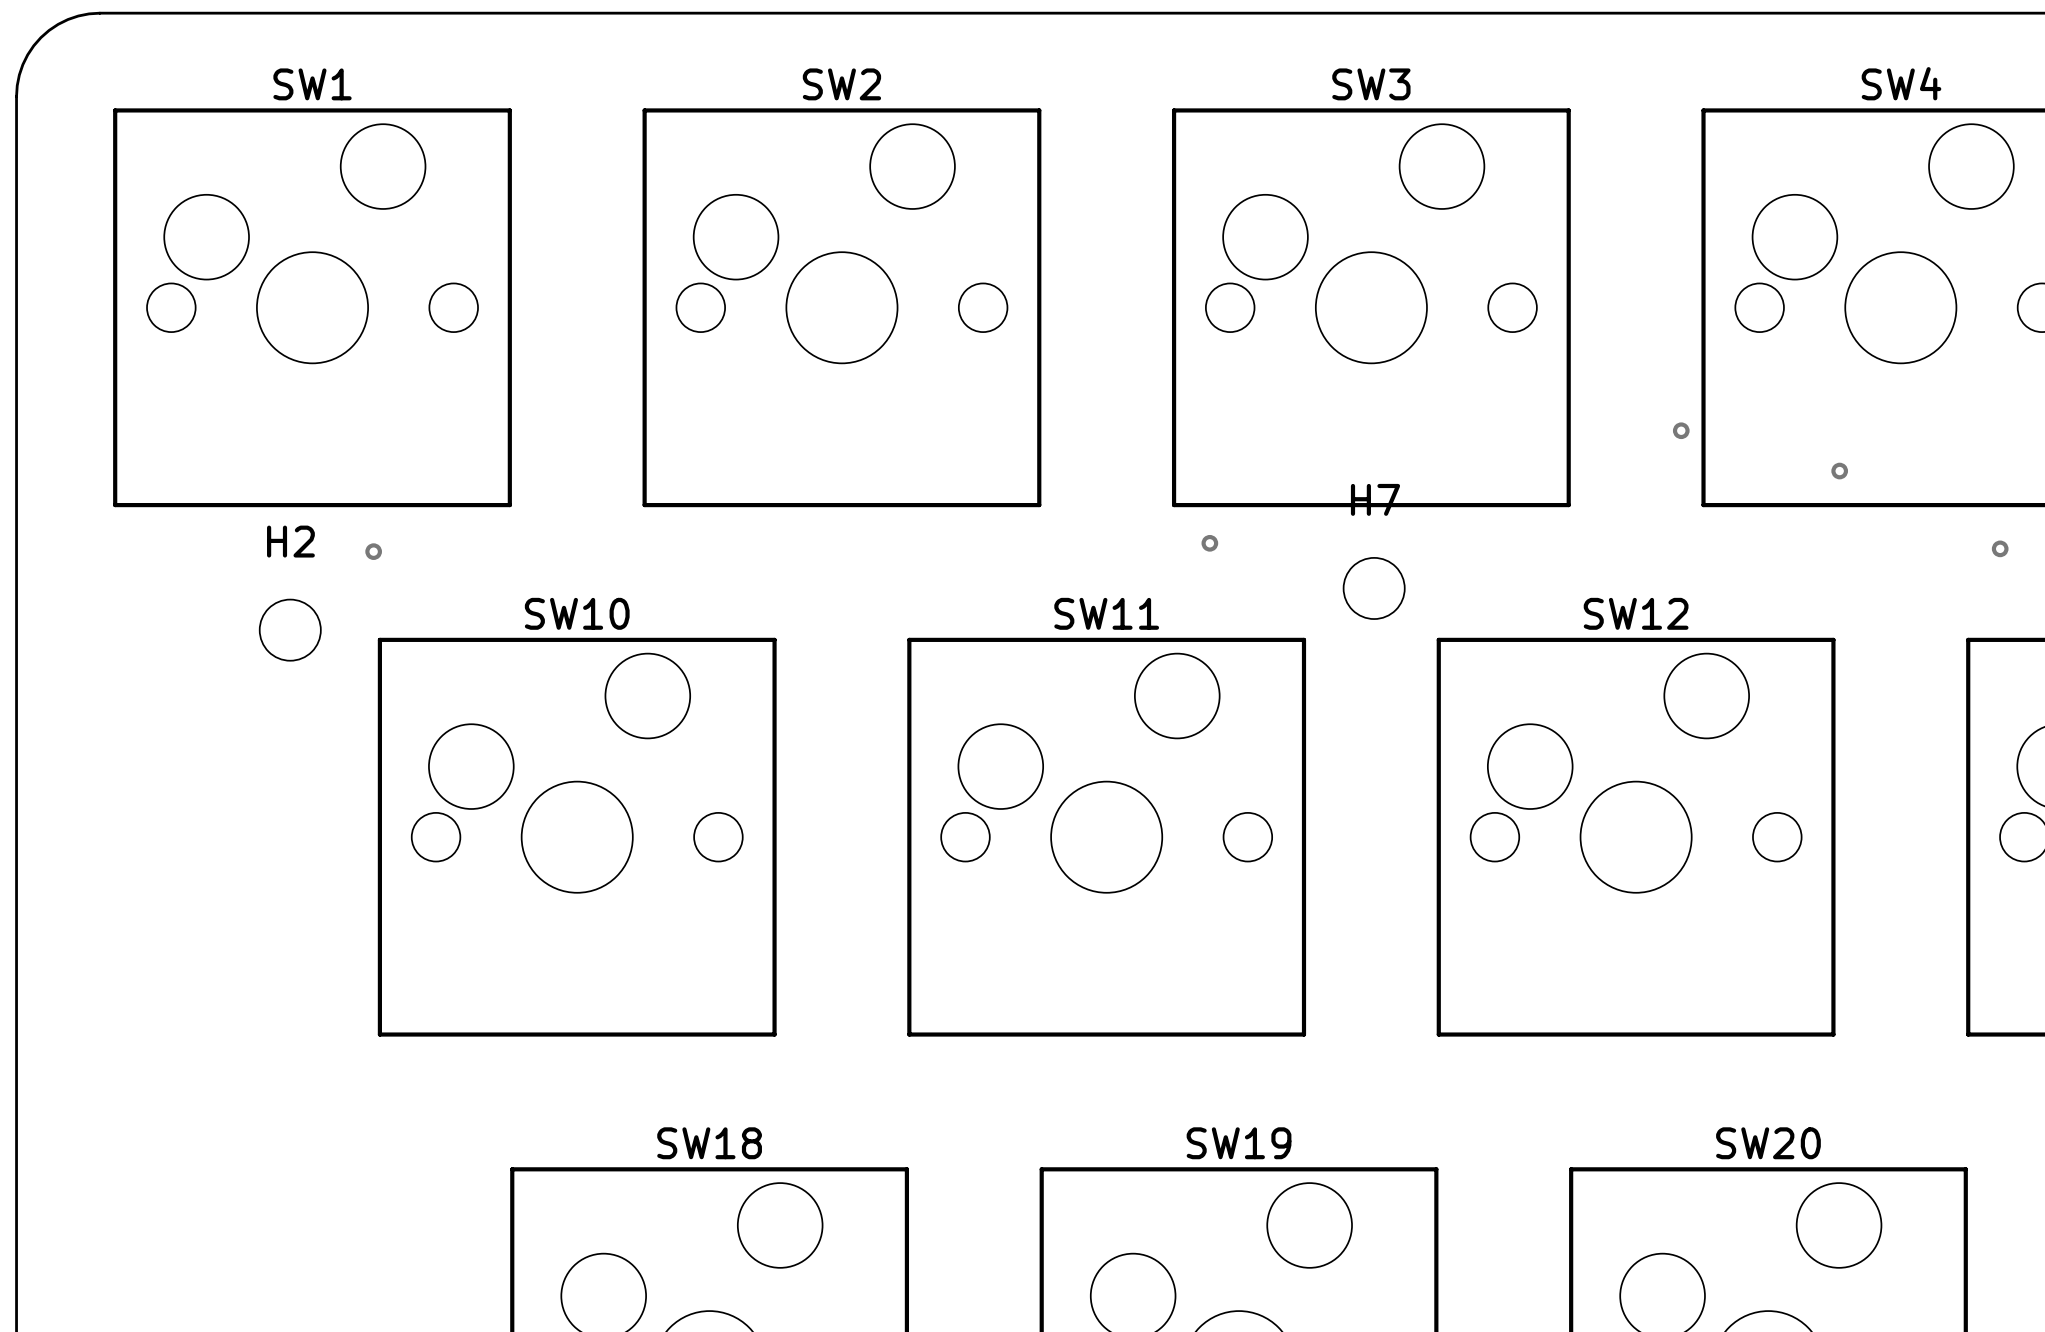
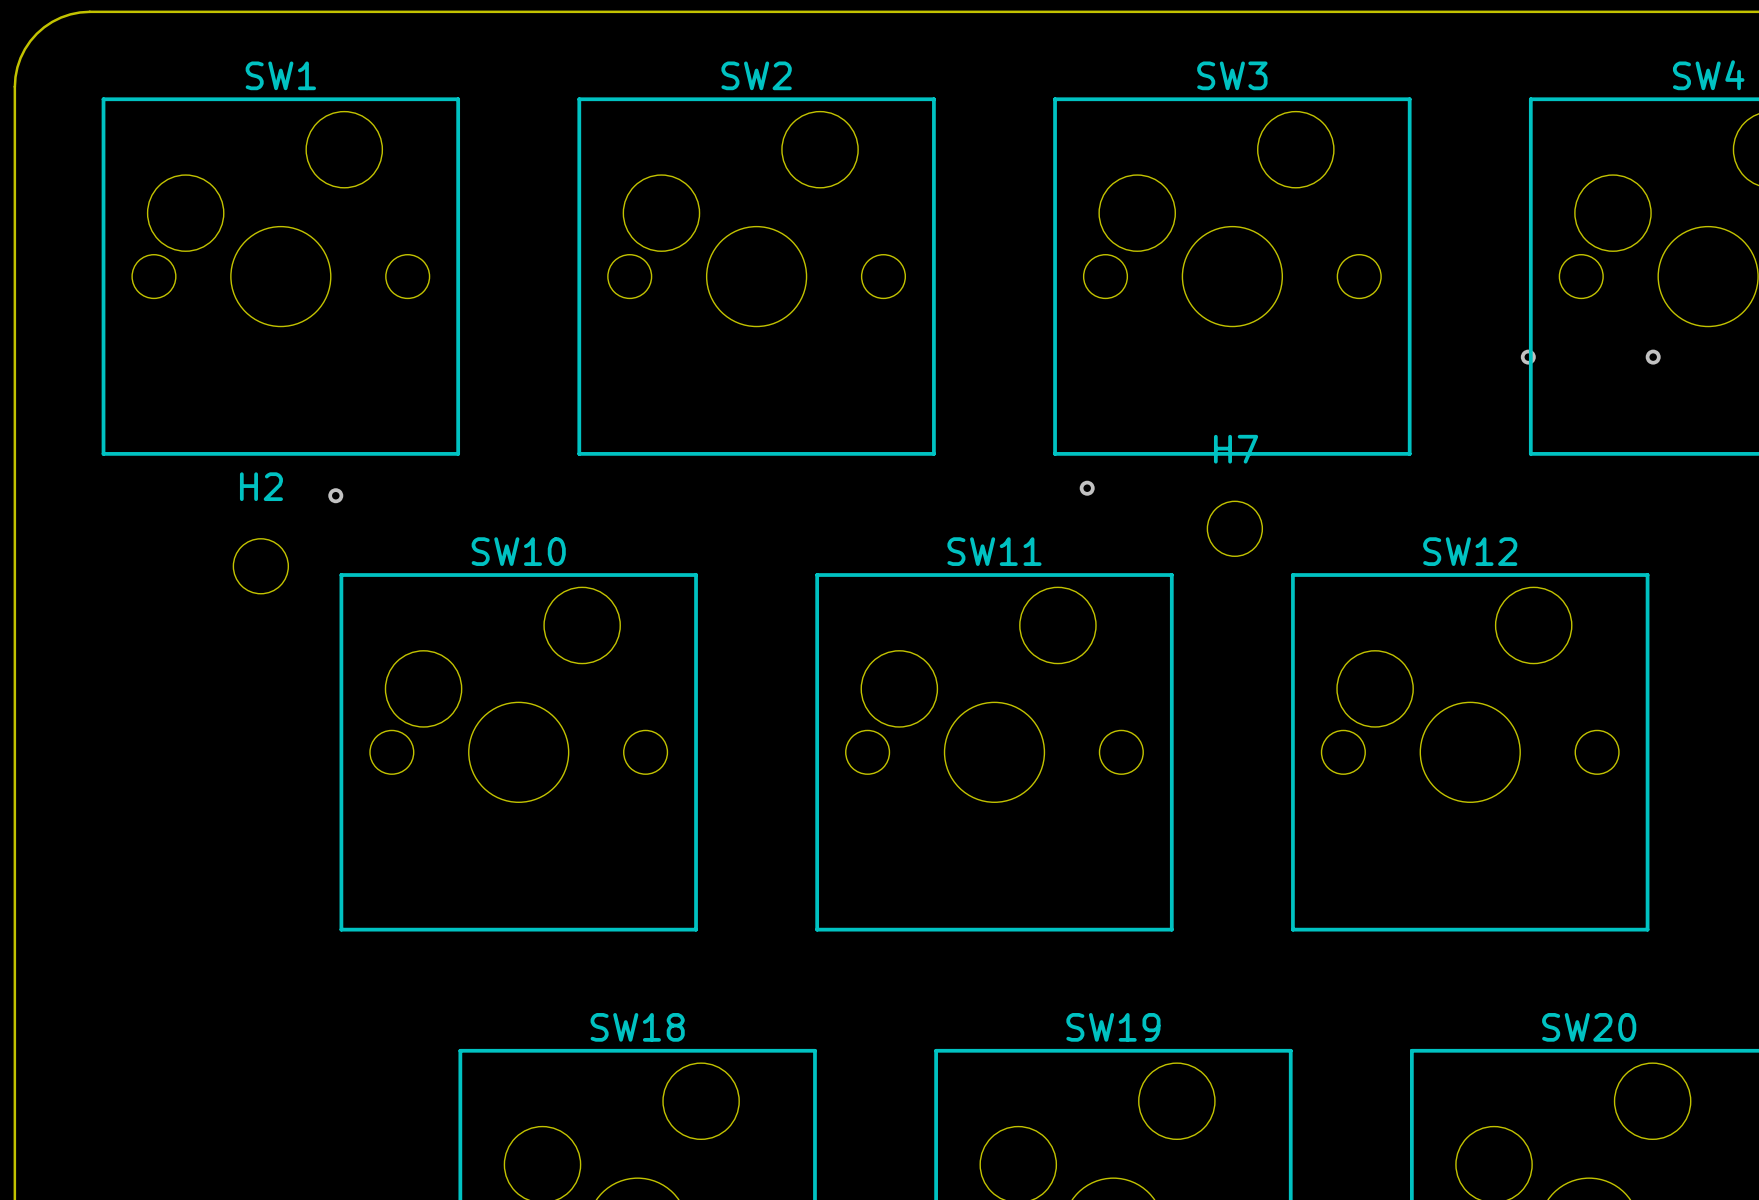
via position: (1681, 430) -> (1528, 357)
via position: (1839, 471) -> (1653, 357)

